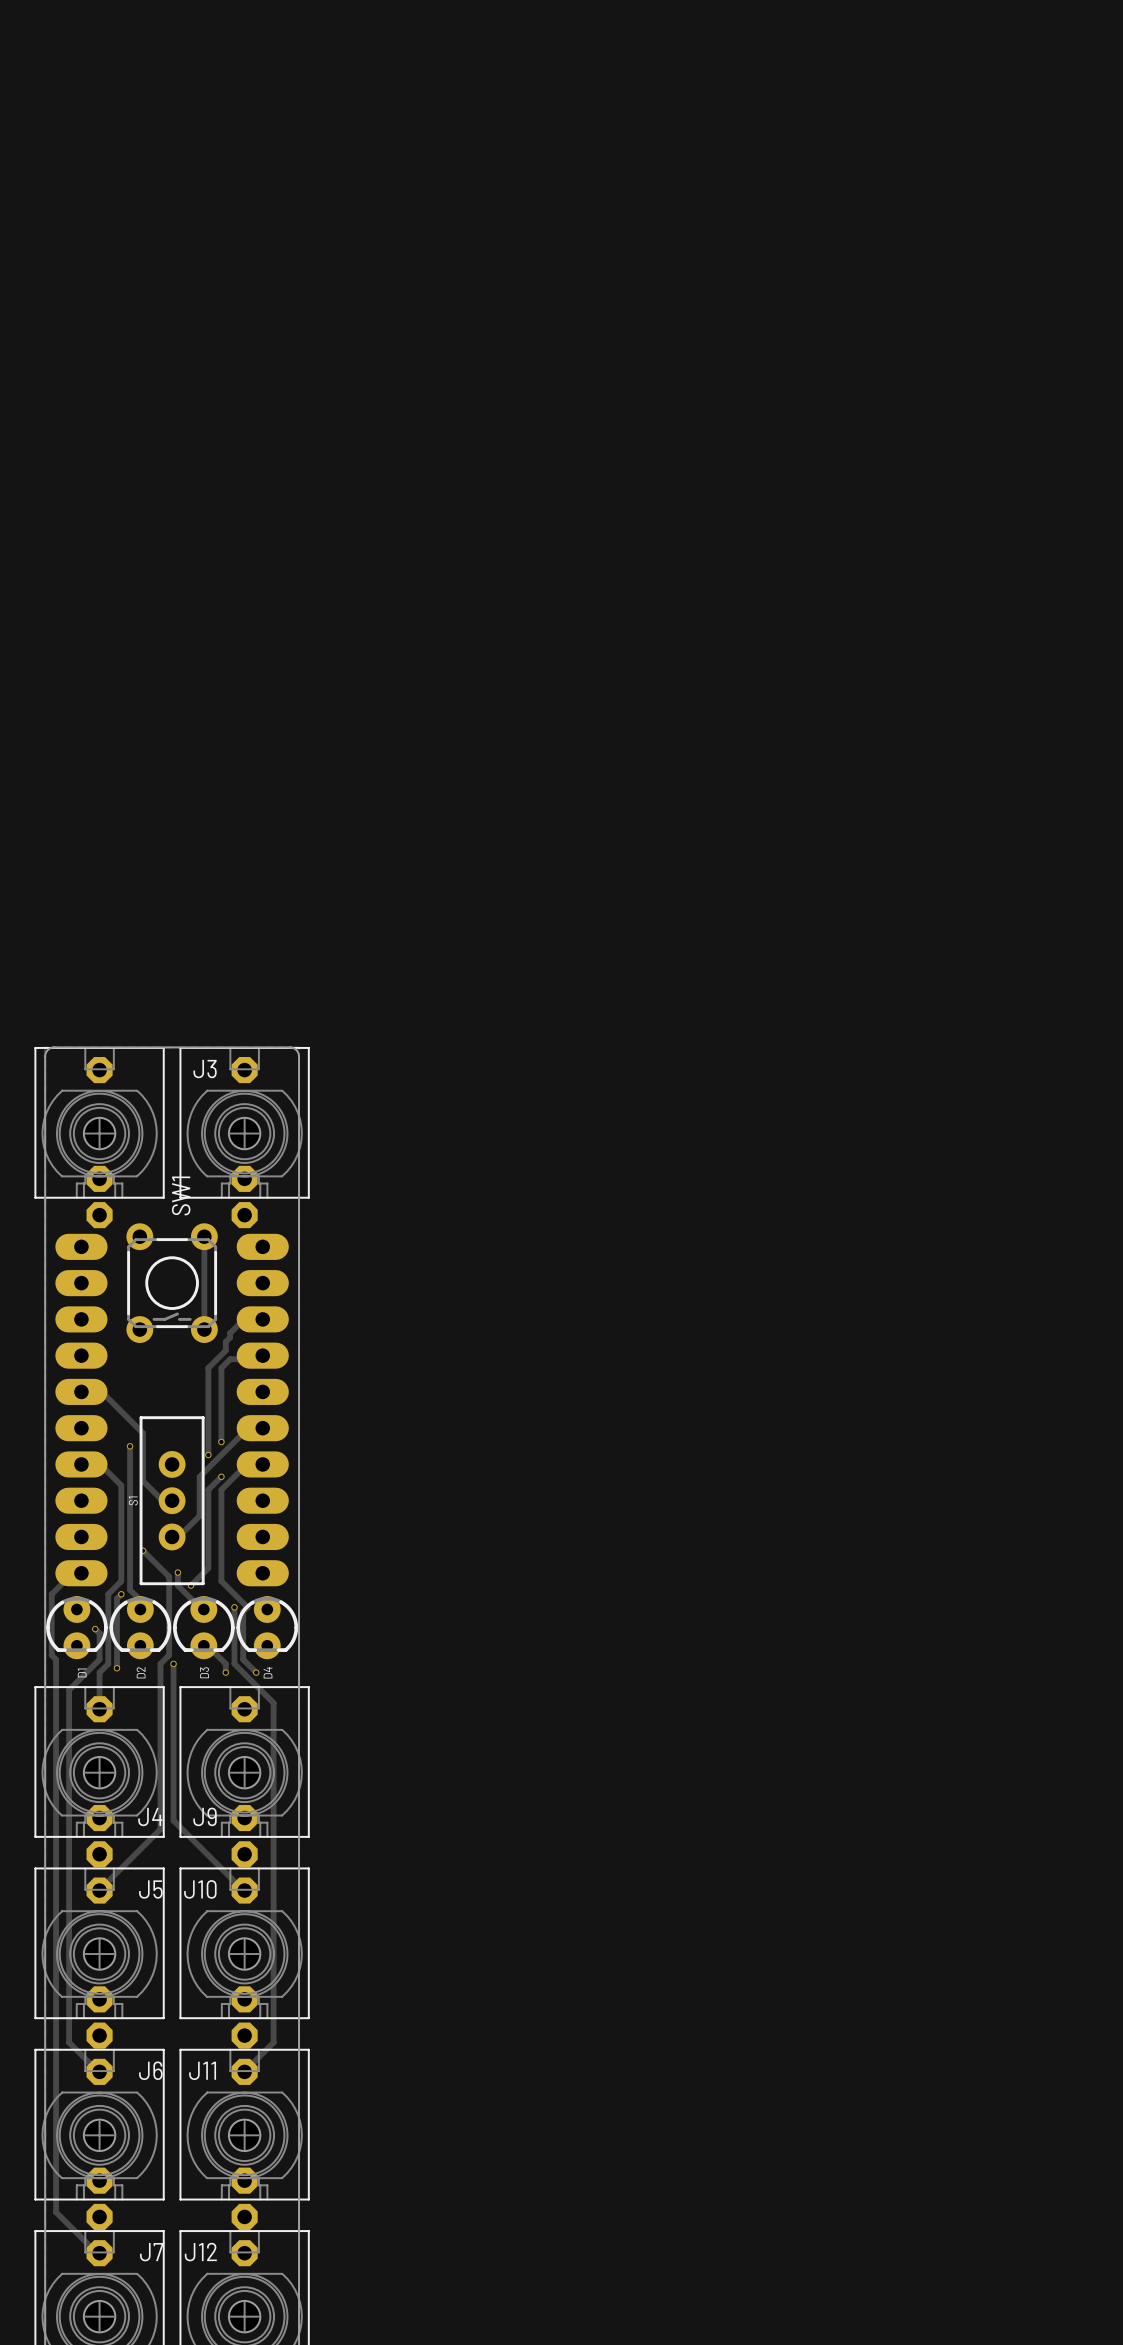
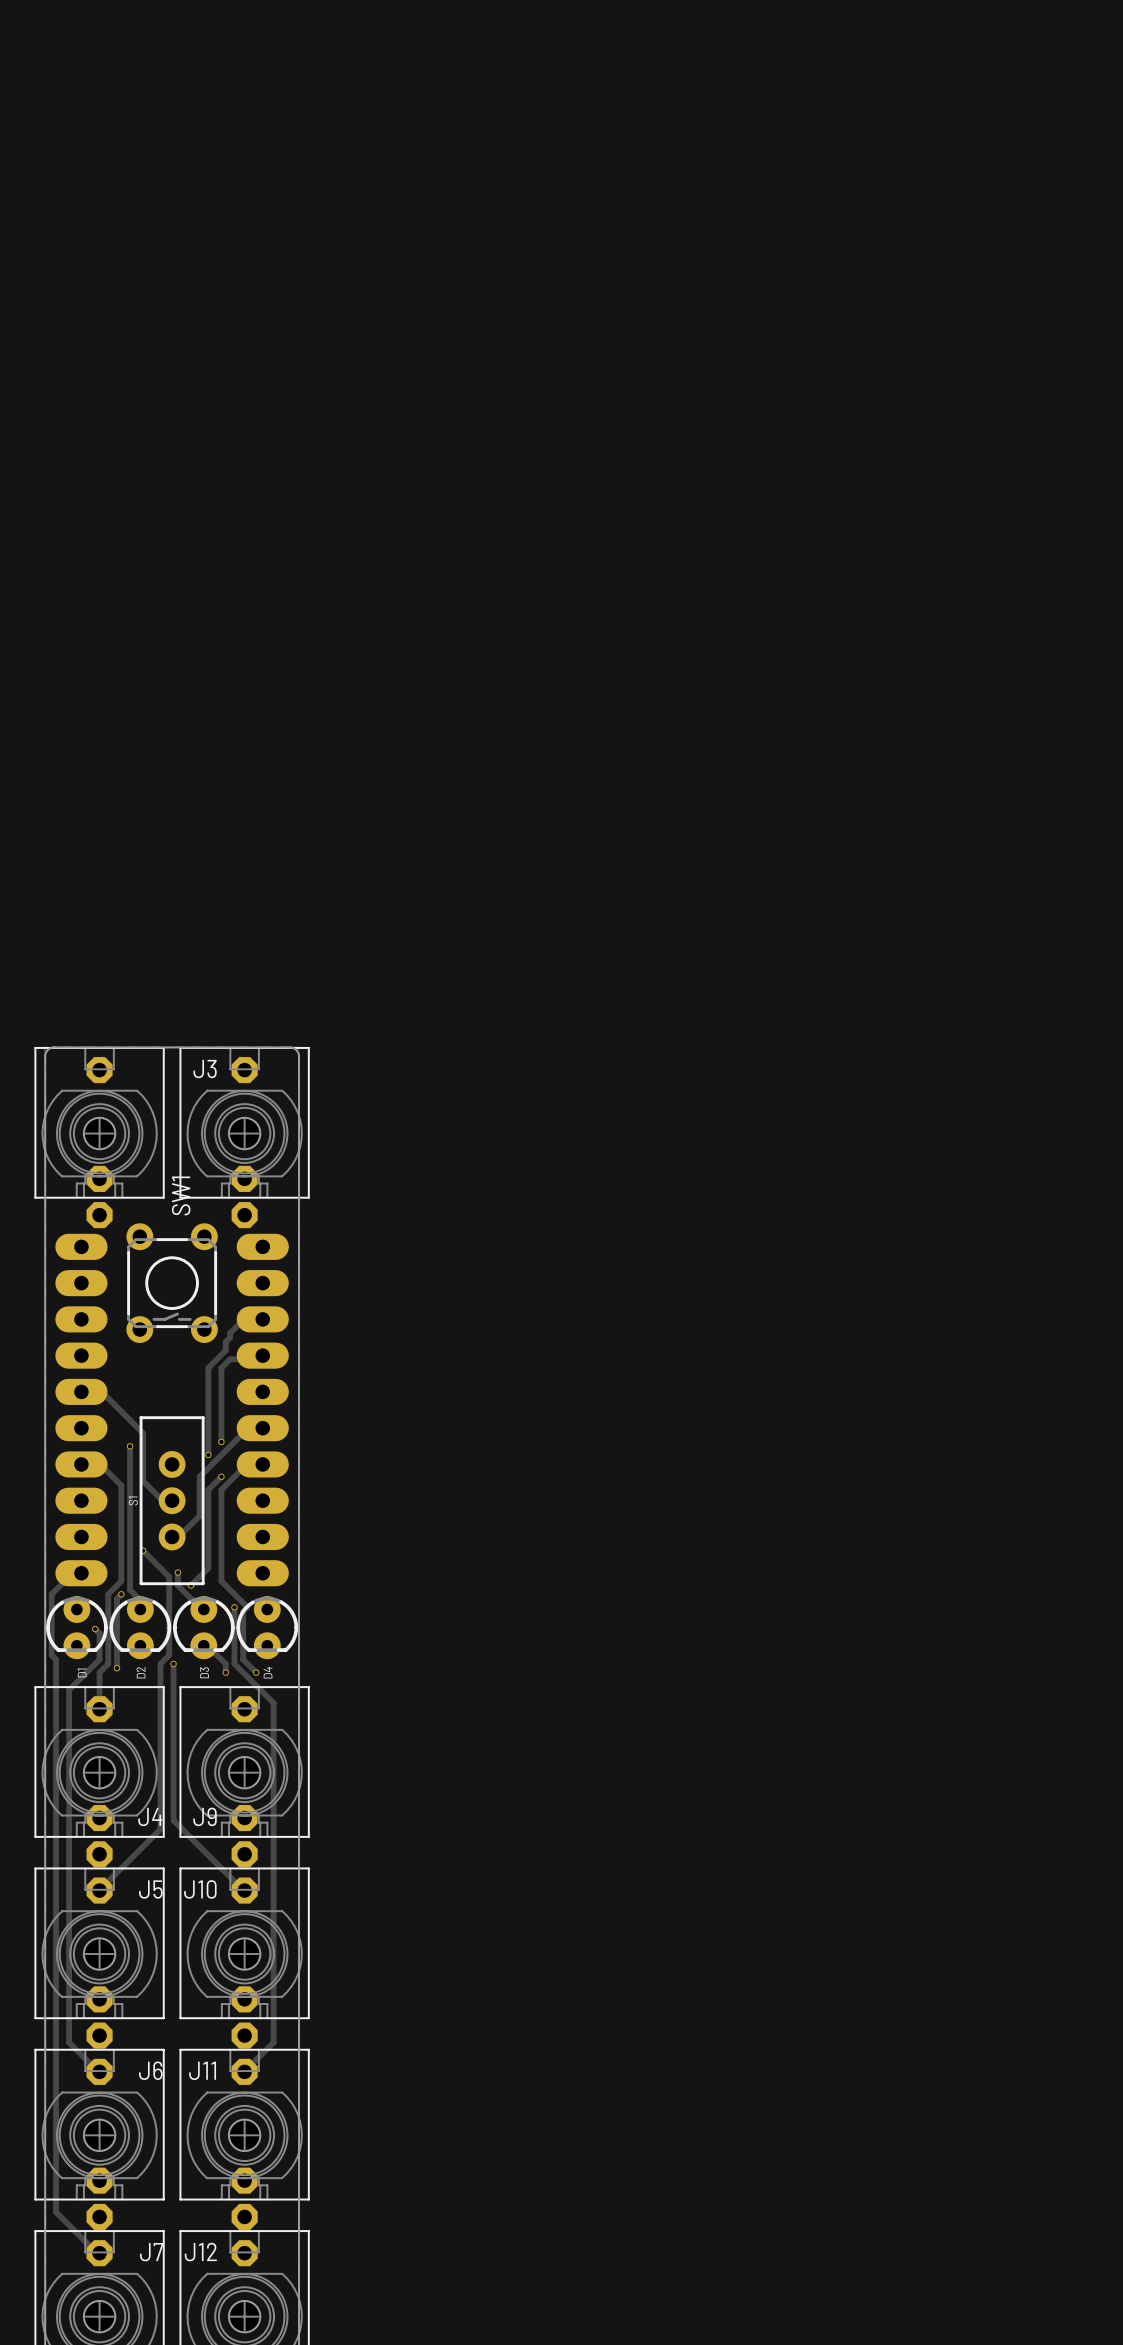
track: (204, 1236) (204, 1329) -> none

